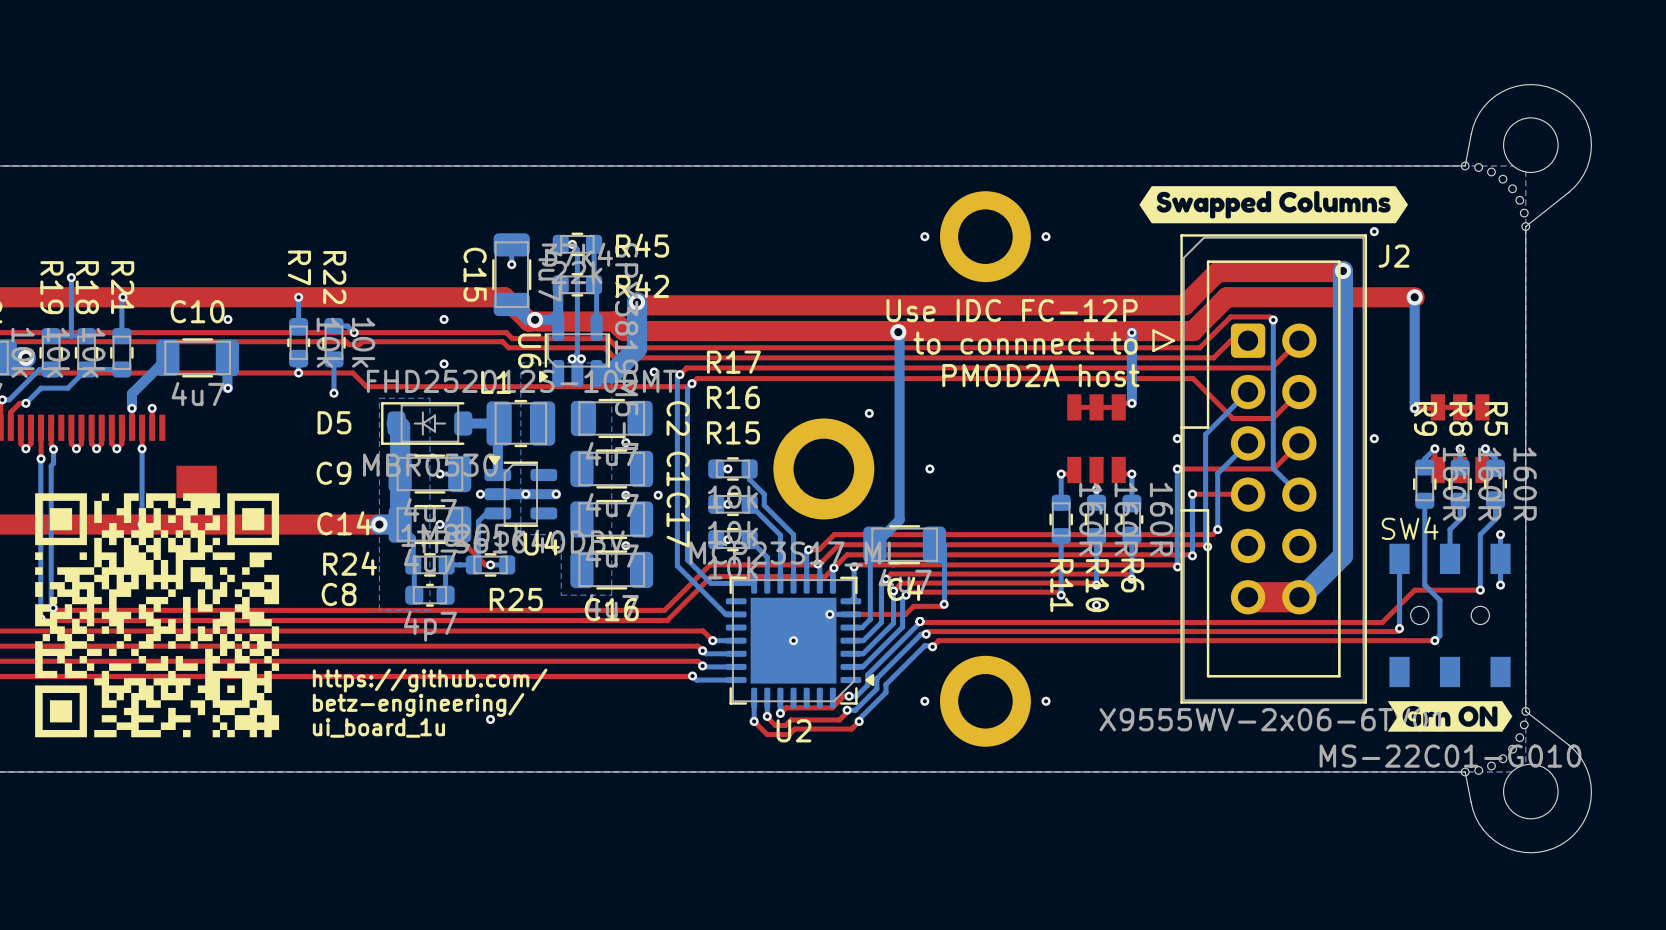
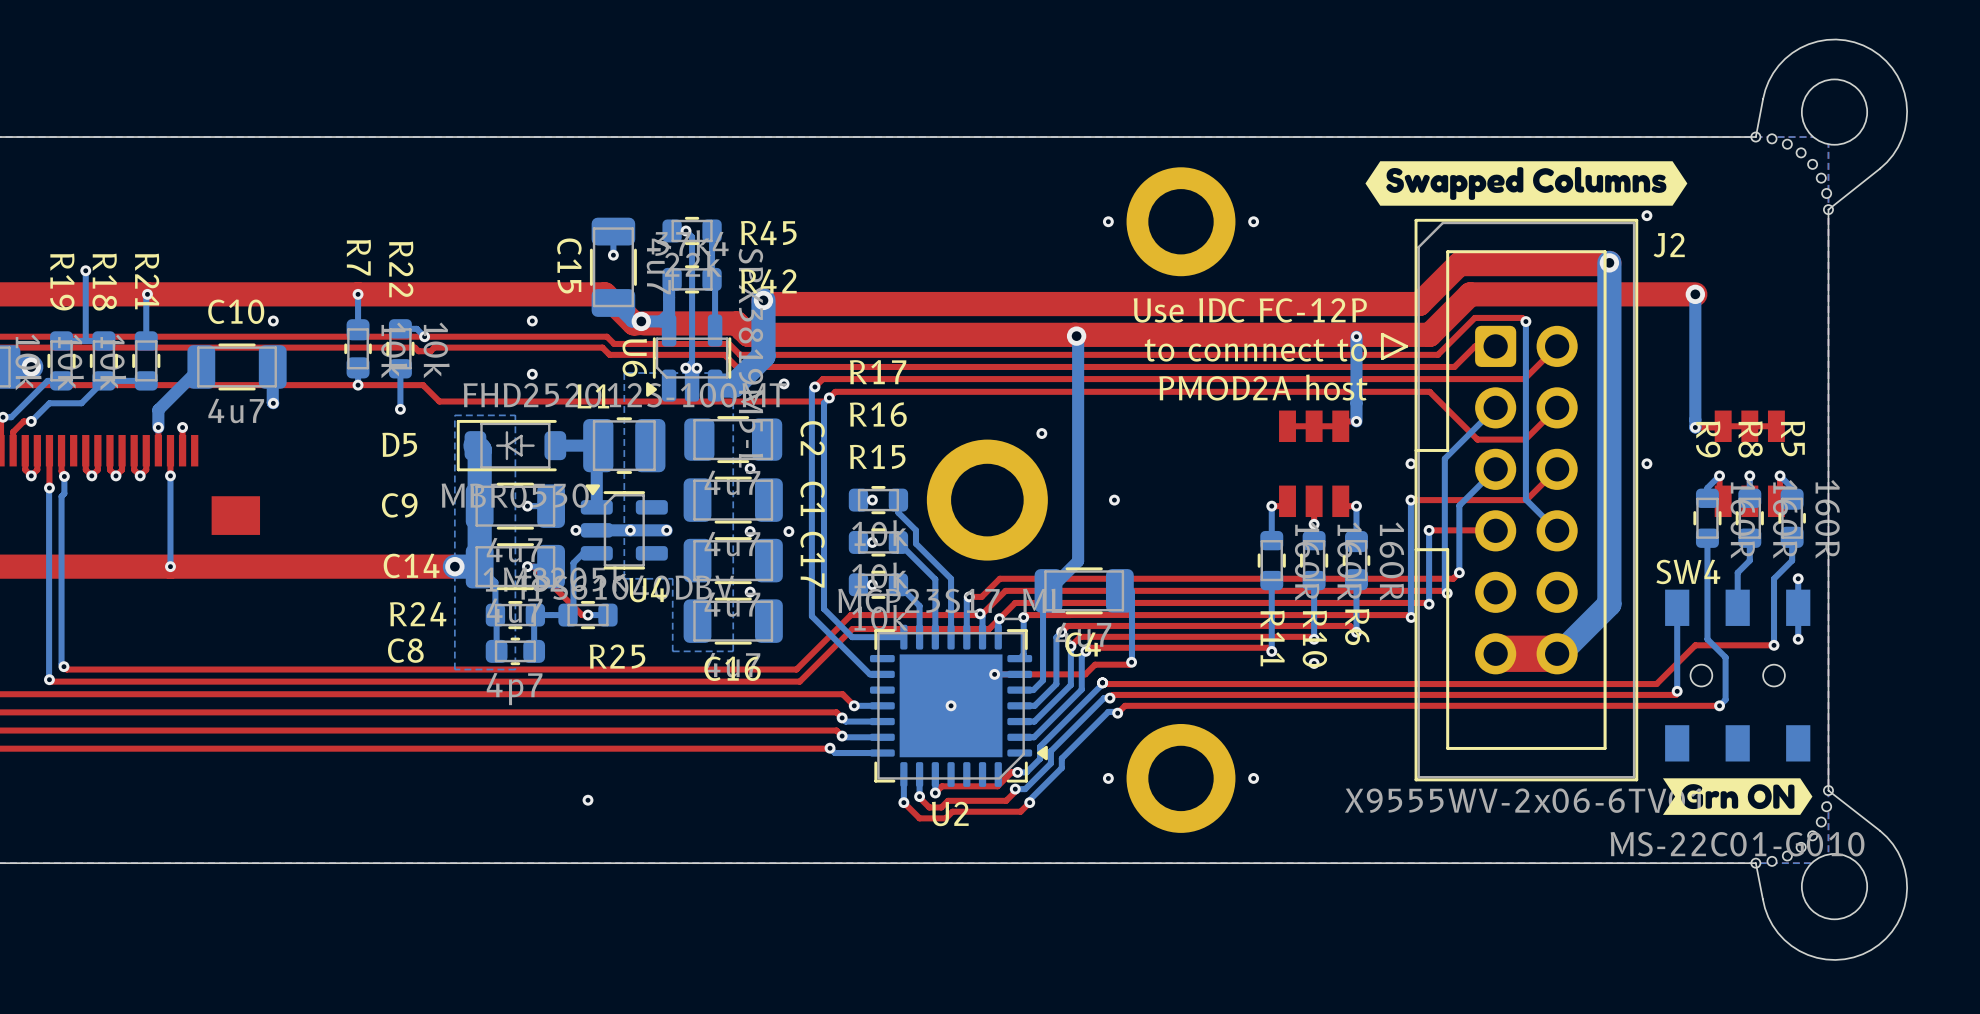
drawing: [35, 493, 280, 738] -> none
text: https://github.com/ (430, 680) -> none
text: betz-engineering/ (418, 704) -> none
text: ui_board_1u (378, 727) -> none

